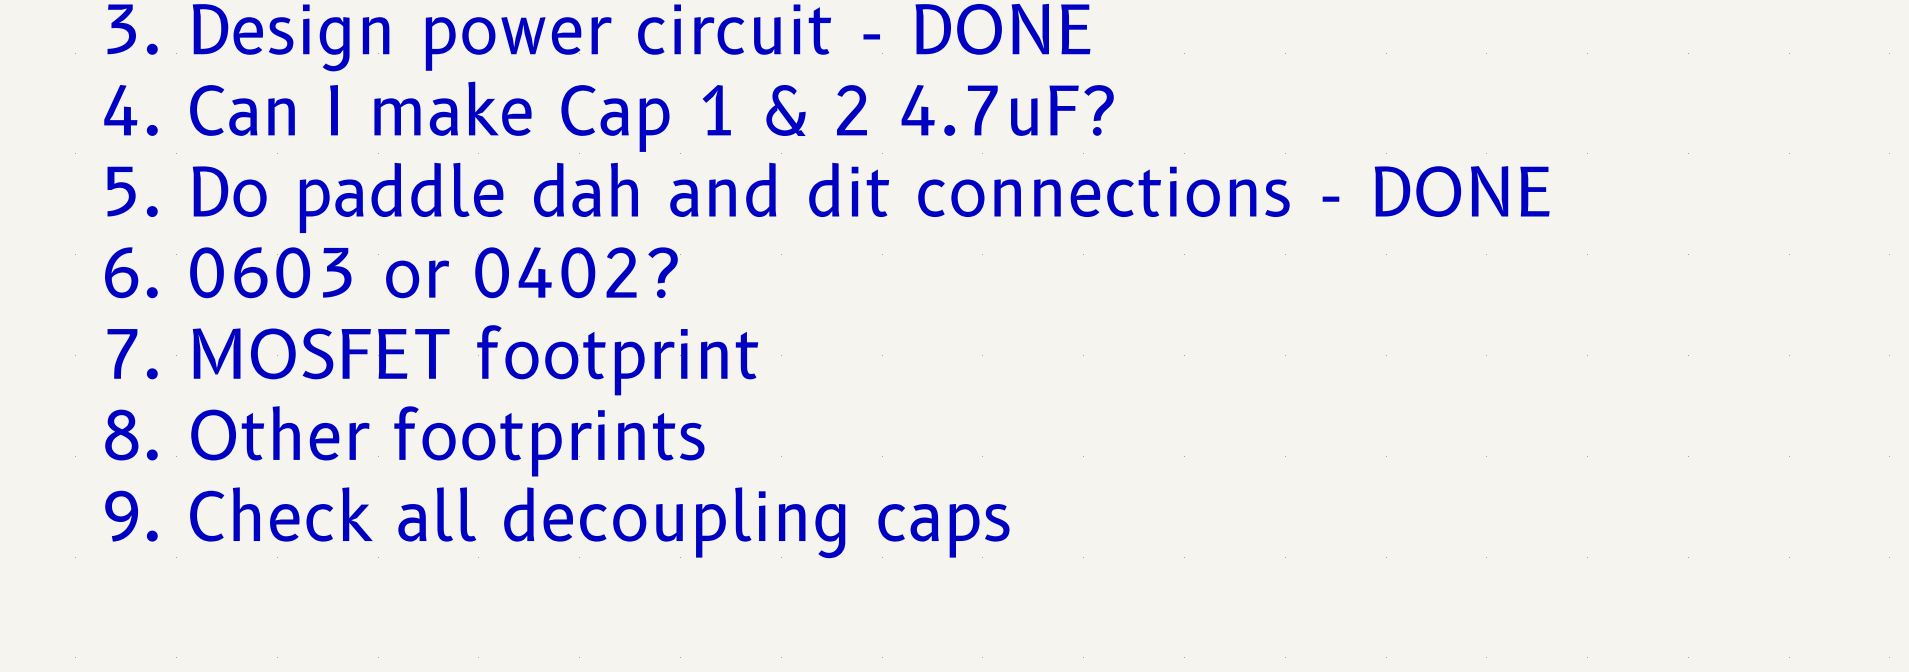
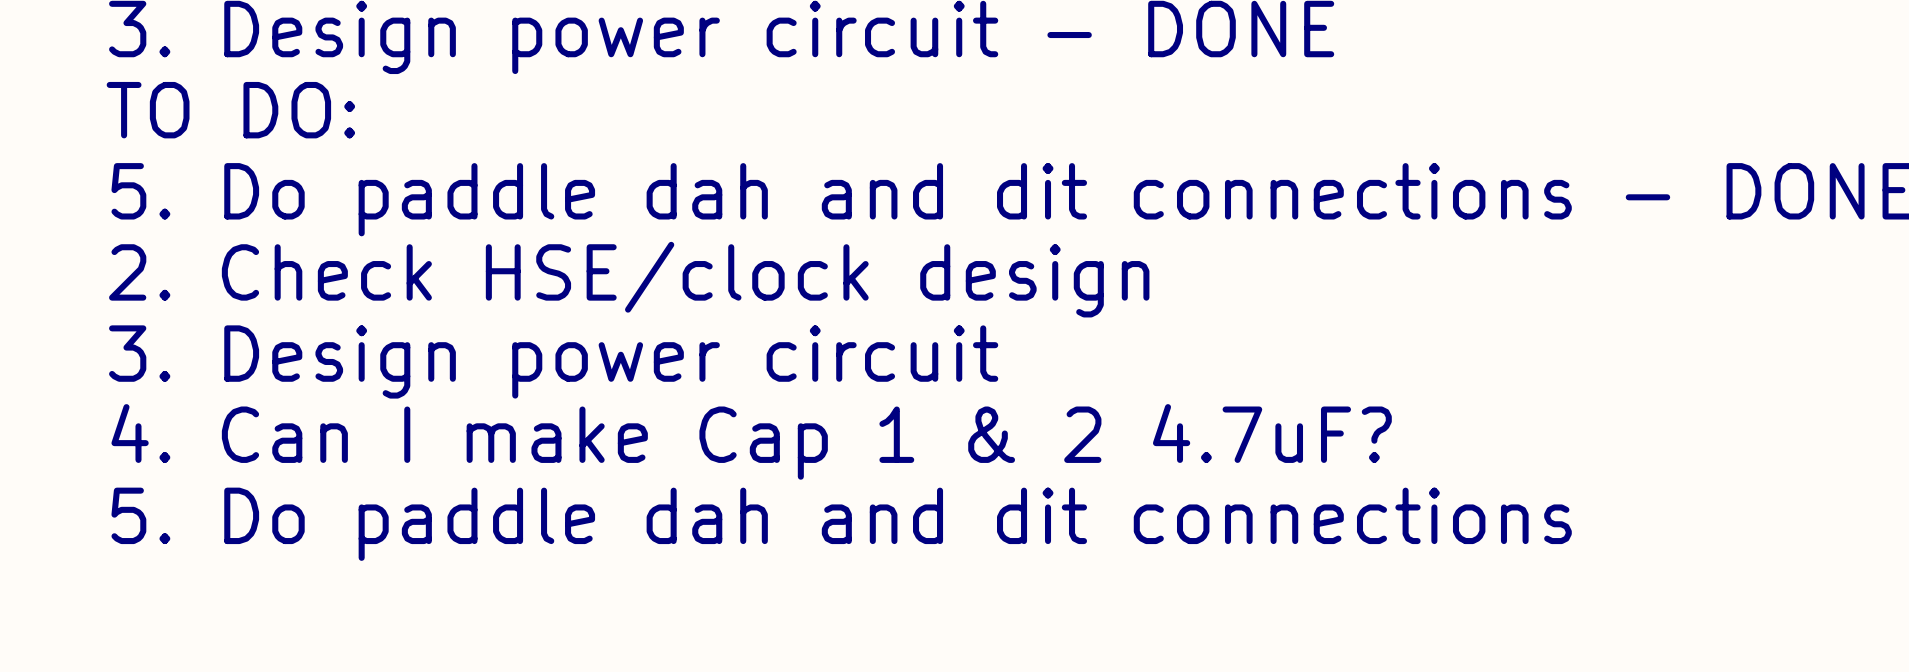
text: 4. Can I make Cap 1 & 2 4.7uF? (609, 116) -> TO DO: (230, 110)
text: 6. 0603 or 0402? (391, 272) -> 2. Check HSE/clock design (629, 279)
text: 7. MOSFET footprint (432, 360) -> 3. Design power circuit (553, 361)
text: 8. Other footprints (404, 441) -> 4. Can I make Cap 1 & 2 4.7uF? (751, 441)
text: 9. Check all decoupling caps (557, 522) -> 5. Do paddle dah and dit connections (841, 524)

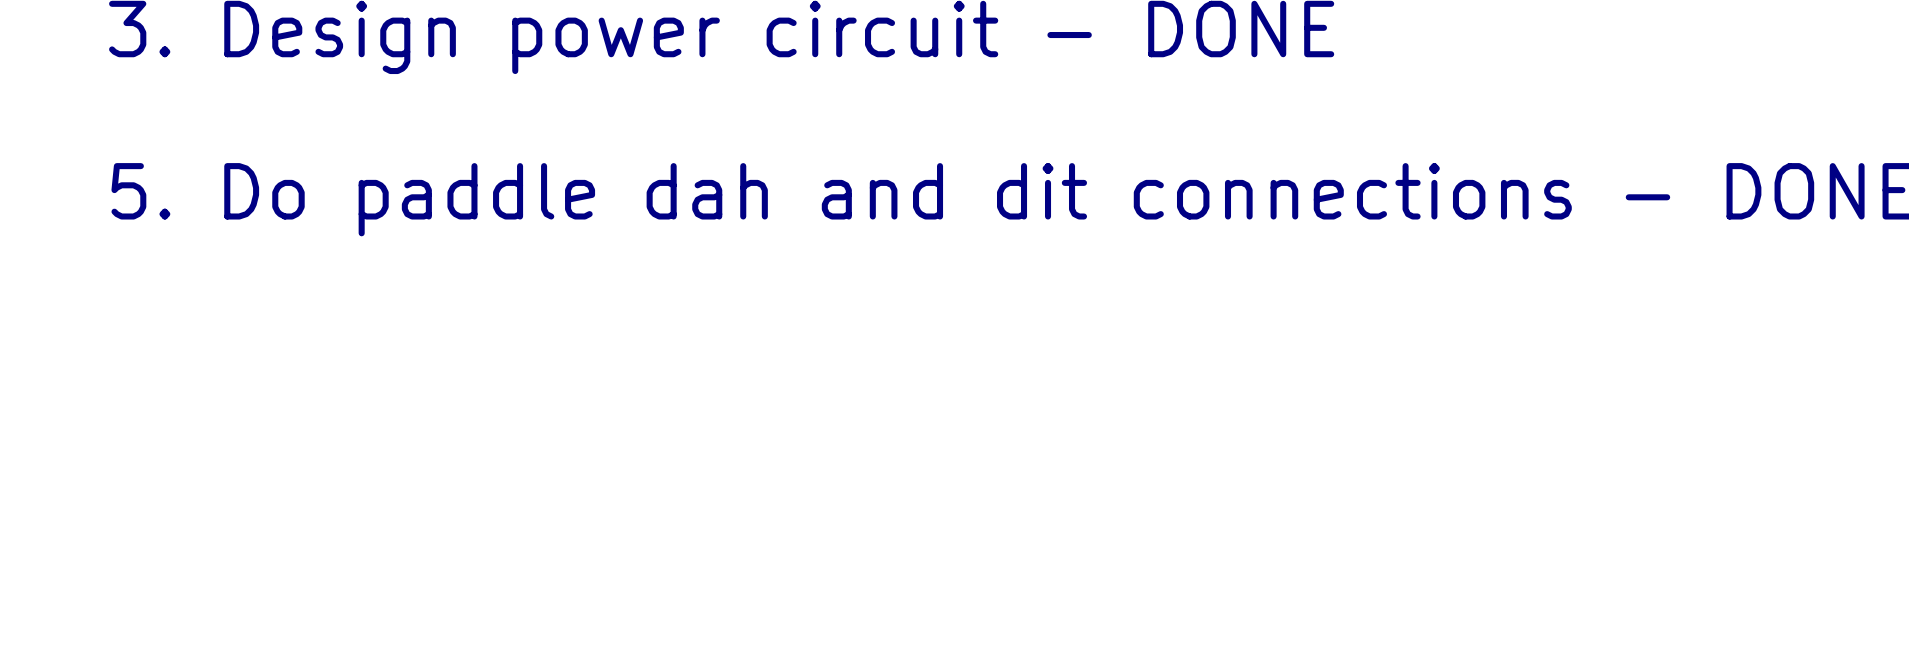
text: TO DO: (230, 110) -> none
text: 2. Check HSE/clock design (629, 279) -> none
text: 3. Design power circuit (553, 361) -> none
text: 4. Can I make Cap 1 & 2 4.7uF? (751, 441) -> none
text: 5. Do paddle dah and dit connections (841, 524) -> none

